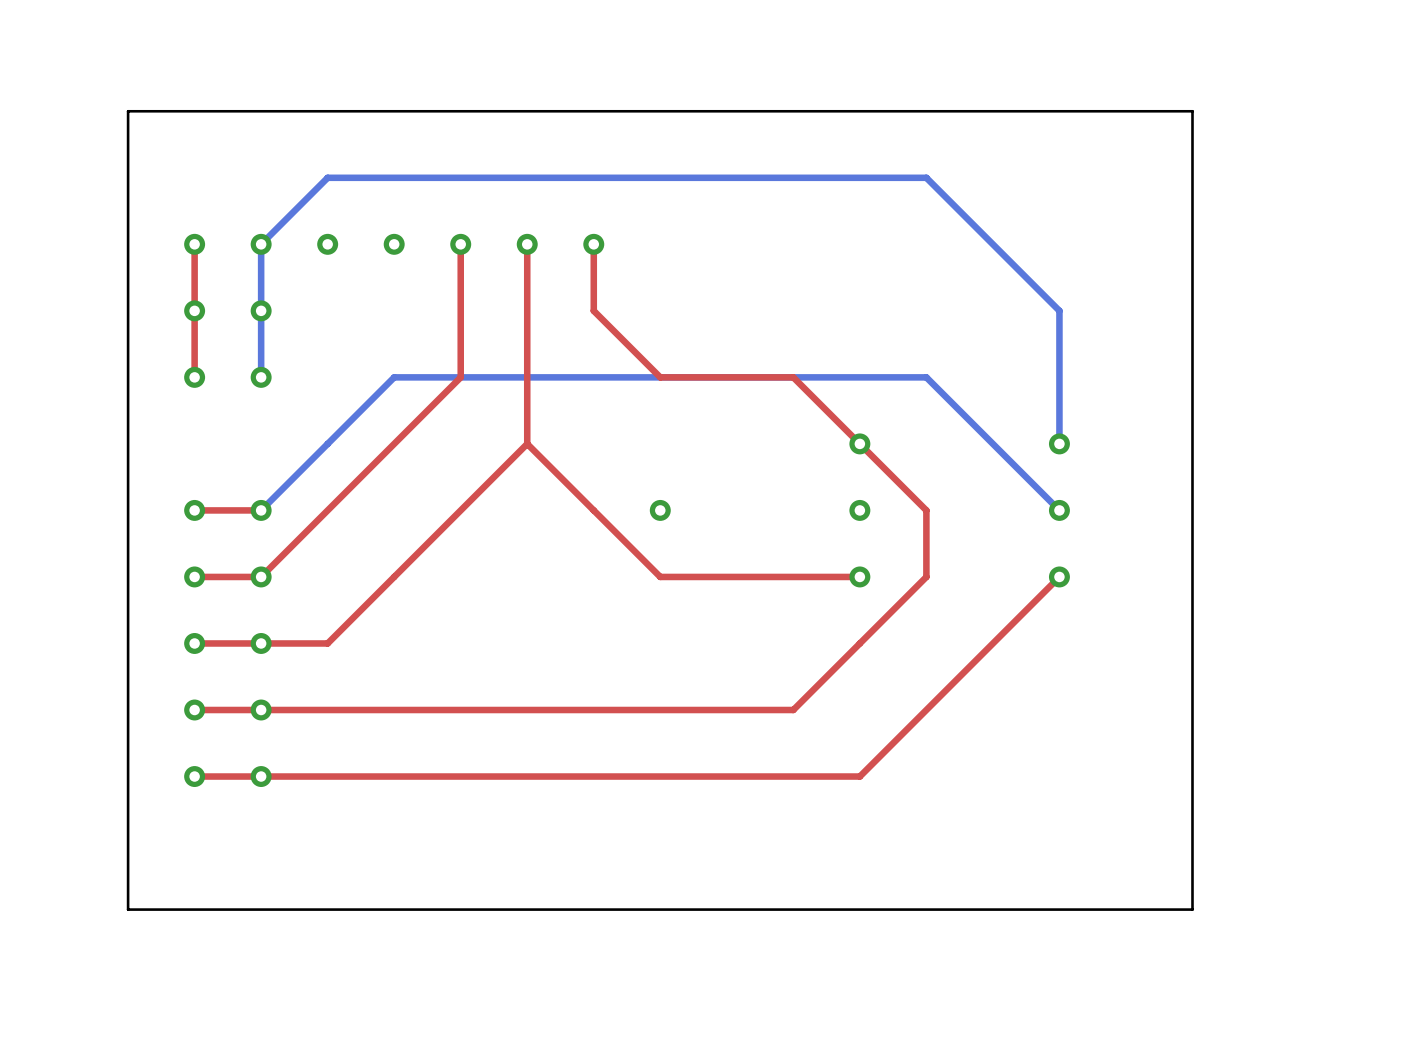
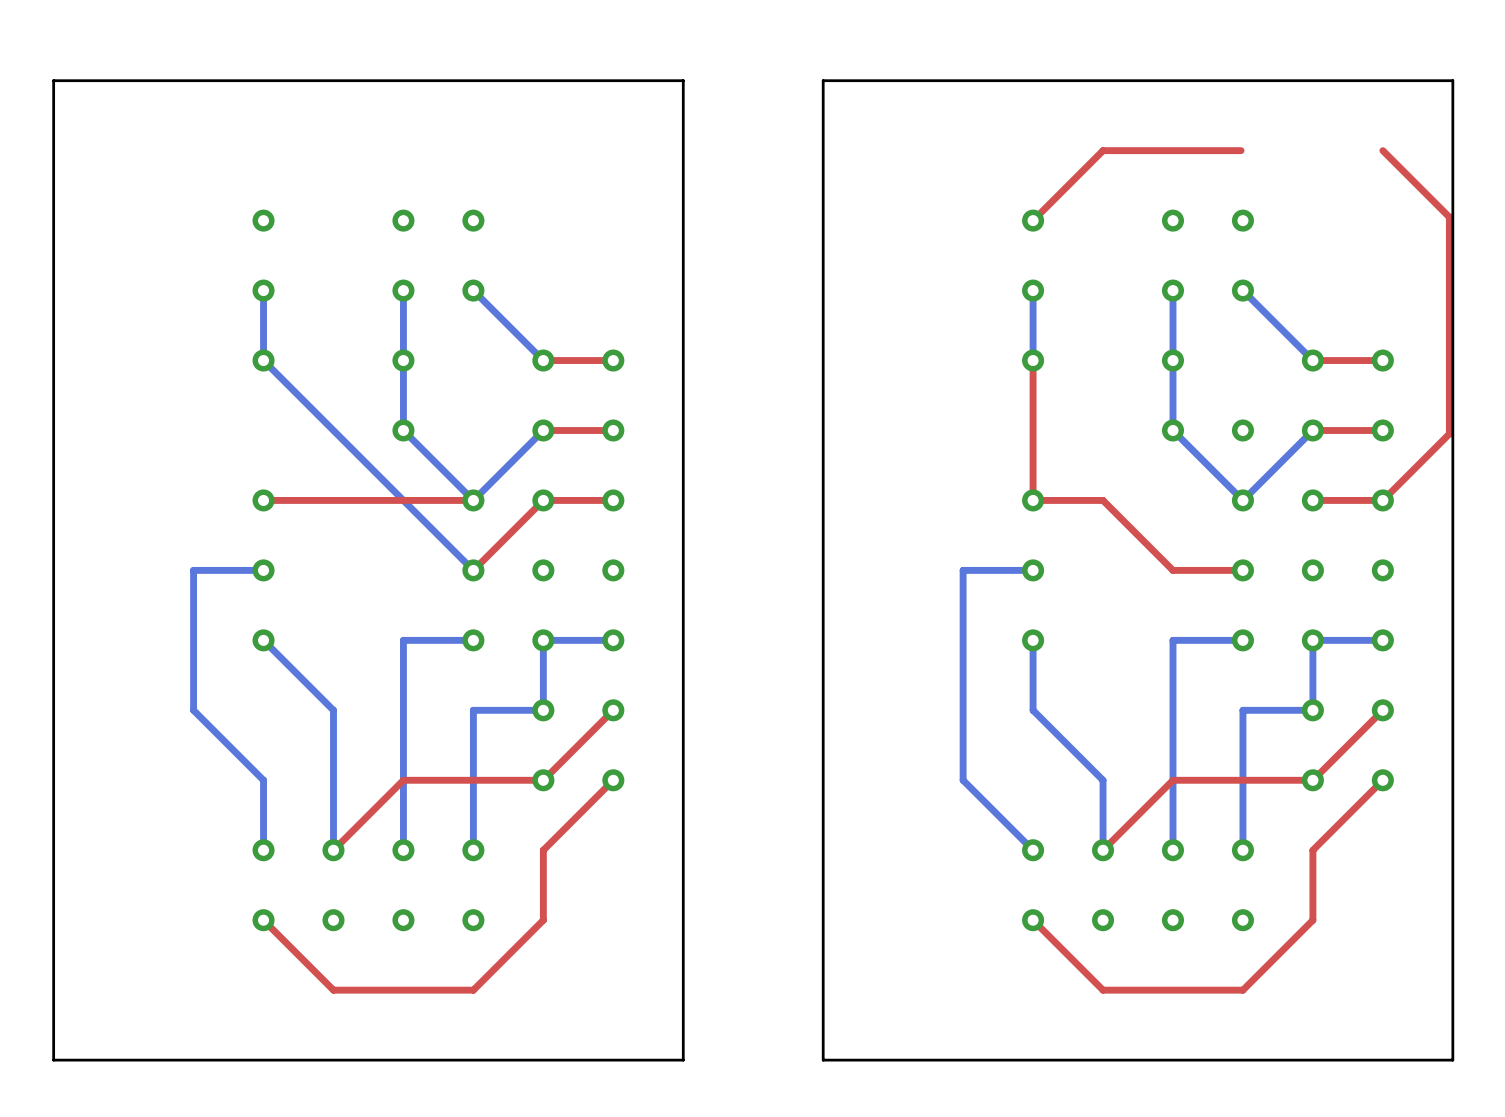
board edge: none -> (53, 80) (53, 1060) (683, 1060) (683, 80) (53, 80)
board edge: none -> (823, 80) (823, 1060) (1452, 1060) (1452, 80) (823, 80)
board edge: (128, 111) (1192, 111) (1192, 909) (128, 909) (128, 111) -> none
top track: none -> (1241, 150) (1103, 150) (1033, 220)
top track: none -> (1382, 150) (1449, 217) (1449, 433) (1382, 500) (1312, 500)
via: none -> (263, 220)
via: none -> (403, 220)
via: none -> (473, 220)
via: none -> (1033, 220)
via: none -> (1173, 220)
via: none -> (1242, 220)
top track: (194, 244) (194, 377) -> none
via: (194, 244) -> none
bottom track: (261, 244) (327, 177) (926, 177) (1059, 310) (1059, 443) -> none
via: (327, 244) -> none
bottom track: none -> (403, 290) (403, 430) (473, 500) (543, 430)
top track: (460, 244) (460, 377) (261, 576) (194, 576) -> none
bottom track: none -> (473, 290) (543, 360)
top track: (527, 244) (527, 443) (660, 576) (859, 576) -> none
via: (527, 244) -> none
top track: (593, 244) (593, 310) (660, 377) (793, 377) (926, 510) (926, 576) (793, 710) (527, 710) -> (613, 710) (543, 780)
via: (593, 244) -> none
bottom track: none -> (1033, 290) (1033, 360)
via: none -> (1033, 290)
bottom track: none -> (1173, 290) (1173, 430) (1242, 500) (1312, 430)
via: none -> (1173, 290)
bottom track: none -> (1242, 290) (1312, 360)
via: none -> (1242, 290)
via: (194, 310) -> none
bottom track: (261, 310) (261, 377) -> (263, 360) (473, 570)
via: none -> (403, 360)
top track: none -> (543, 360) (613, 360)
via: none -> (543, 360)
via: none -> (613, 360)
top track: none -> (1033, 360) (1033, 500) (1103, 500) (1173, 570) (1242, 570)
via: none -> (1033, 360)
via: none -> (1173, 360)
top track: none -> (1312, 360) (1382, 360)
via: none -> (1312, 360)
via: none -> (1382, 360)
via: (194, 377) -> none
via: (261, 377) -> none
via: none -> (403, 430)
top track: none -> (543, 430) (613, 430)
via: none -> (543, 430)
via: none -> (613, 430)
via: none -> (1173, 430)
via: none -> (1242, 430)
top track: none -> (1312, 430) (1382, 430)
via: none -> (1312, 430)
via: none -> (1382, 430)
top track: none -> (263, 500) (473, 500)
via: none -> (263, 500)
via: none -> (473, 500)
via: none -> (543, 500)
via: none -> (613, 500)
via: (859, 443) -> none
via: none -> (1033, 500)
via: (1059, 443) -> none
via: none -> (1242, 500)
via: none -> (1312, 500)
via: none -> (1382, 500)
top track: (194, 510) (261, 510) -> (543, 500) (613, 500)
via: (194, 510) -> none
bottom track: (261, 510) (394, 377) (926, 377) (1059, 510) -> (263, 570) (193, 570) (193, 710) (263, 780) (263, 850)
top track: (460, 510) (327, 643) (194, 643) -> none
via: none -> (473, 570)
via: none -> (543, 570)
via: none -> (613, 570)
via: (660, 510) -> none
via: (859, 510) -> none
bottom track: none -> (1033, 570) (963, 570) (963, 780) (1033, 850)
via: none -> (1033, 570)
via: (1059, 510) -> none
via: none -> (1242, 570)
via: none -> (1312, 570)
via: none -> (1382, 570)
via: (194, 576) -> none
bottom track: none -> (263, 640) (333, 710) (333, 850)
bottom track: none -> (473, 640) (403, 640) (403, 850)
via: none -> (473, 640)
via: none -> (543, 640)
bottom track: none -> (613, 640) (543, 640) (543, 710) (473, 710) (473, 850)
via: none -> (613, 640)
via: (859, 576) -> none
bottom track: none -> (1033, 640) (1033, 710) (1103, 780) (1103, 850)
via: none -> (1033, 640)
top track: (1059, 576) (859, 776) (194, 776) -> none
via: (1059, 576) -> none
bottom track: none -> (1242, 640) (1173, 640) (1173, 850)
via: none -> (1242, 640)
via: none -> (1312, 640)
bottom track: none -> (1382, 640) (1312, 640) (1312, 710) (1242, 710) (1242, 850)
via: none -> (1382, 640)
via: (194, 643) -> none
via: (261, 643) -> none
via: none -> (543, 710)
via: none -> (613, 710)
via: none -> (1312, 710)
top track: none -> (1382, 710) (1312, 780) (1173, 780) (1103, 850)
via: none -> (1382, 710)
top track: (194, 710) (394, 710) -> (333, 850) (403, 780)
via: (194, 710) -> none
via: (261, 710) -> none
via: none -> (543, 780)
top track: none -> (613, 780) (543, 850) (543, 920) (473, 990) (333, 990) (263, 920)
via: none -> (613, 780)
via: none -> (1312, 780)
top track: none -> (1382, 780) (1312, 850) (1312, 920) (1242, 990) (1103, 990) (1033, 920)
via: none -> (1382, 780)
via: (194, 776) -> none
via: none -> (333, 850)
via: none -> (403, 850)
via: none -> (473, 850)
via: none -> (1033, 850)
via: none -> (1103, 850)
via: none -> (1173, 850)
via: none -> (1242, 850)
via: none -> (263, 920)
via: none -> (333, 920)
via: none -> (403, 920)
via: none -> (473, 920)
via: none -> (1033, 920)
via: none -> (1103, 920)
via: none -> (1173, 920)
via: none -> (1242, 920)

